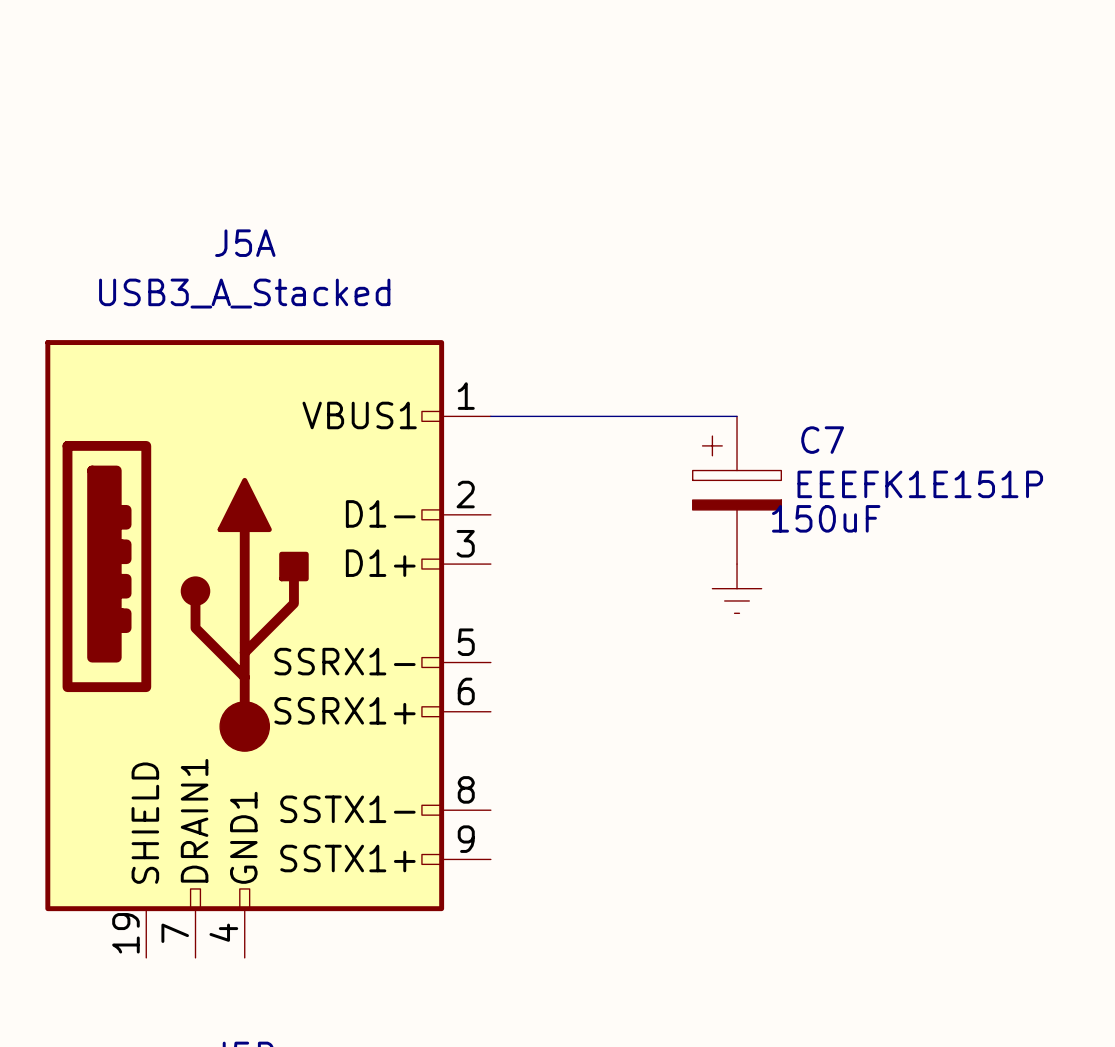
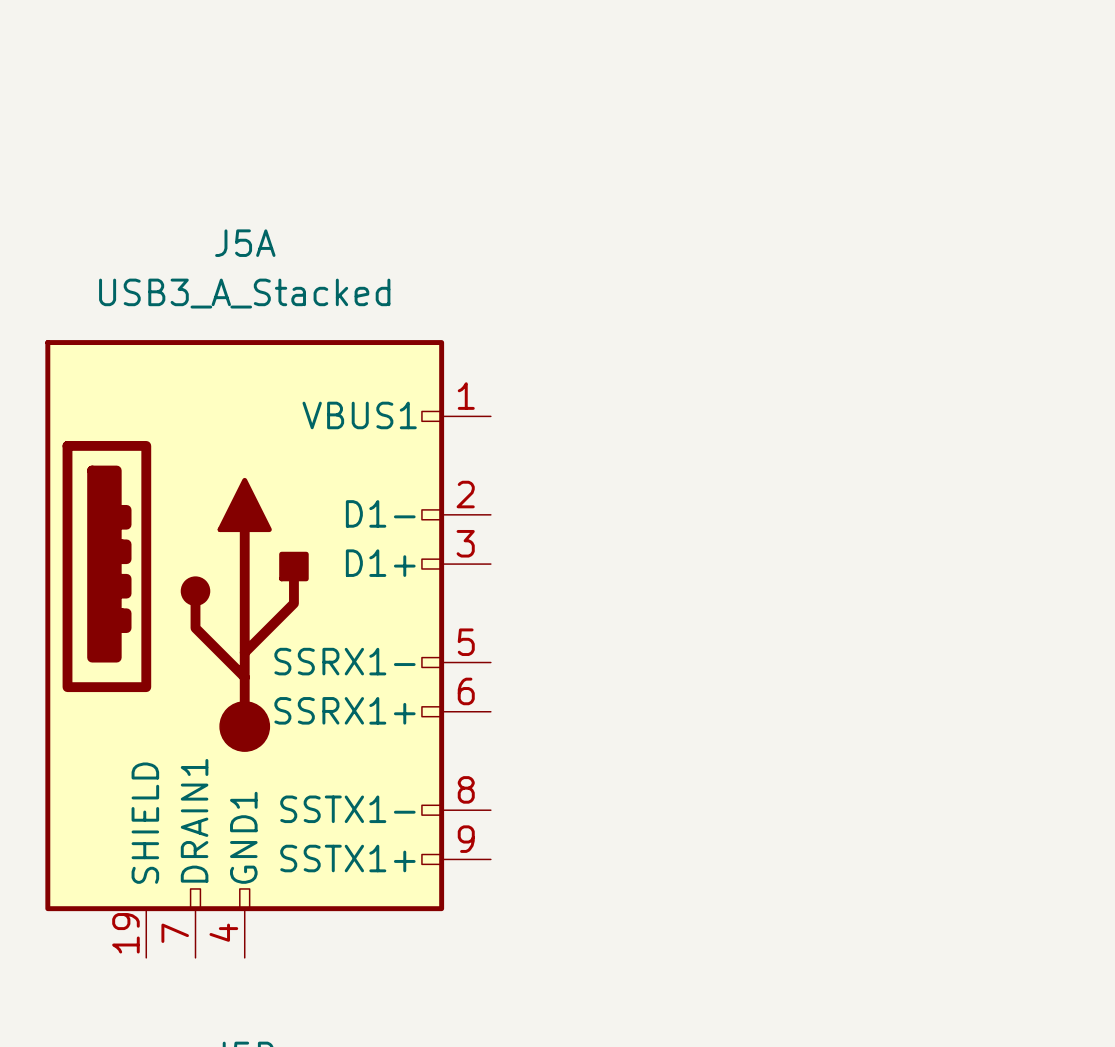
wire: (490, 416) (737, 416) -> none
C7: EEEFK1E151P (737, 490) -> none
power symbol: (737, 588) -> none

